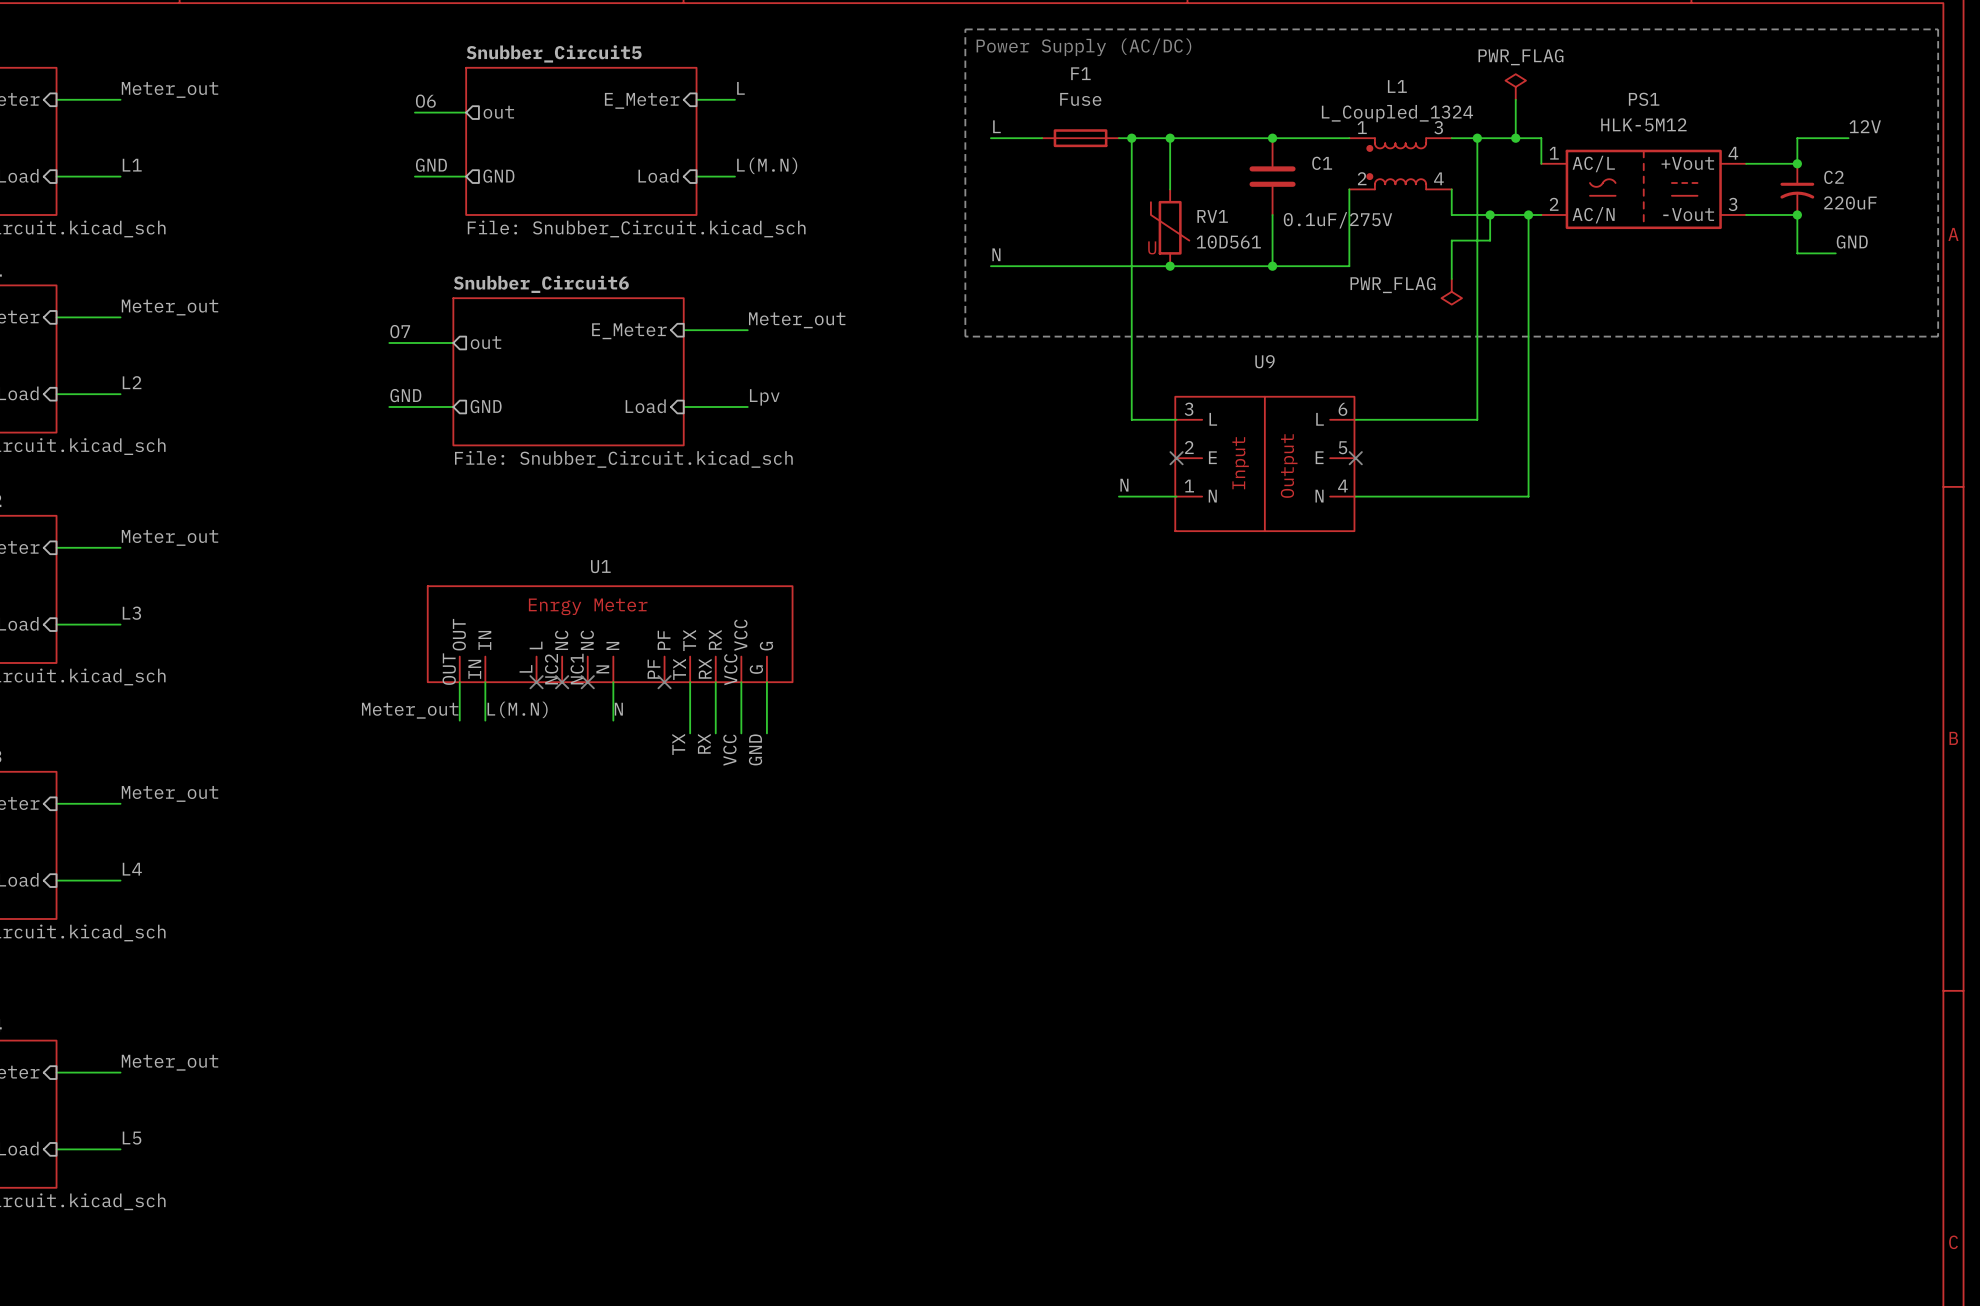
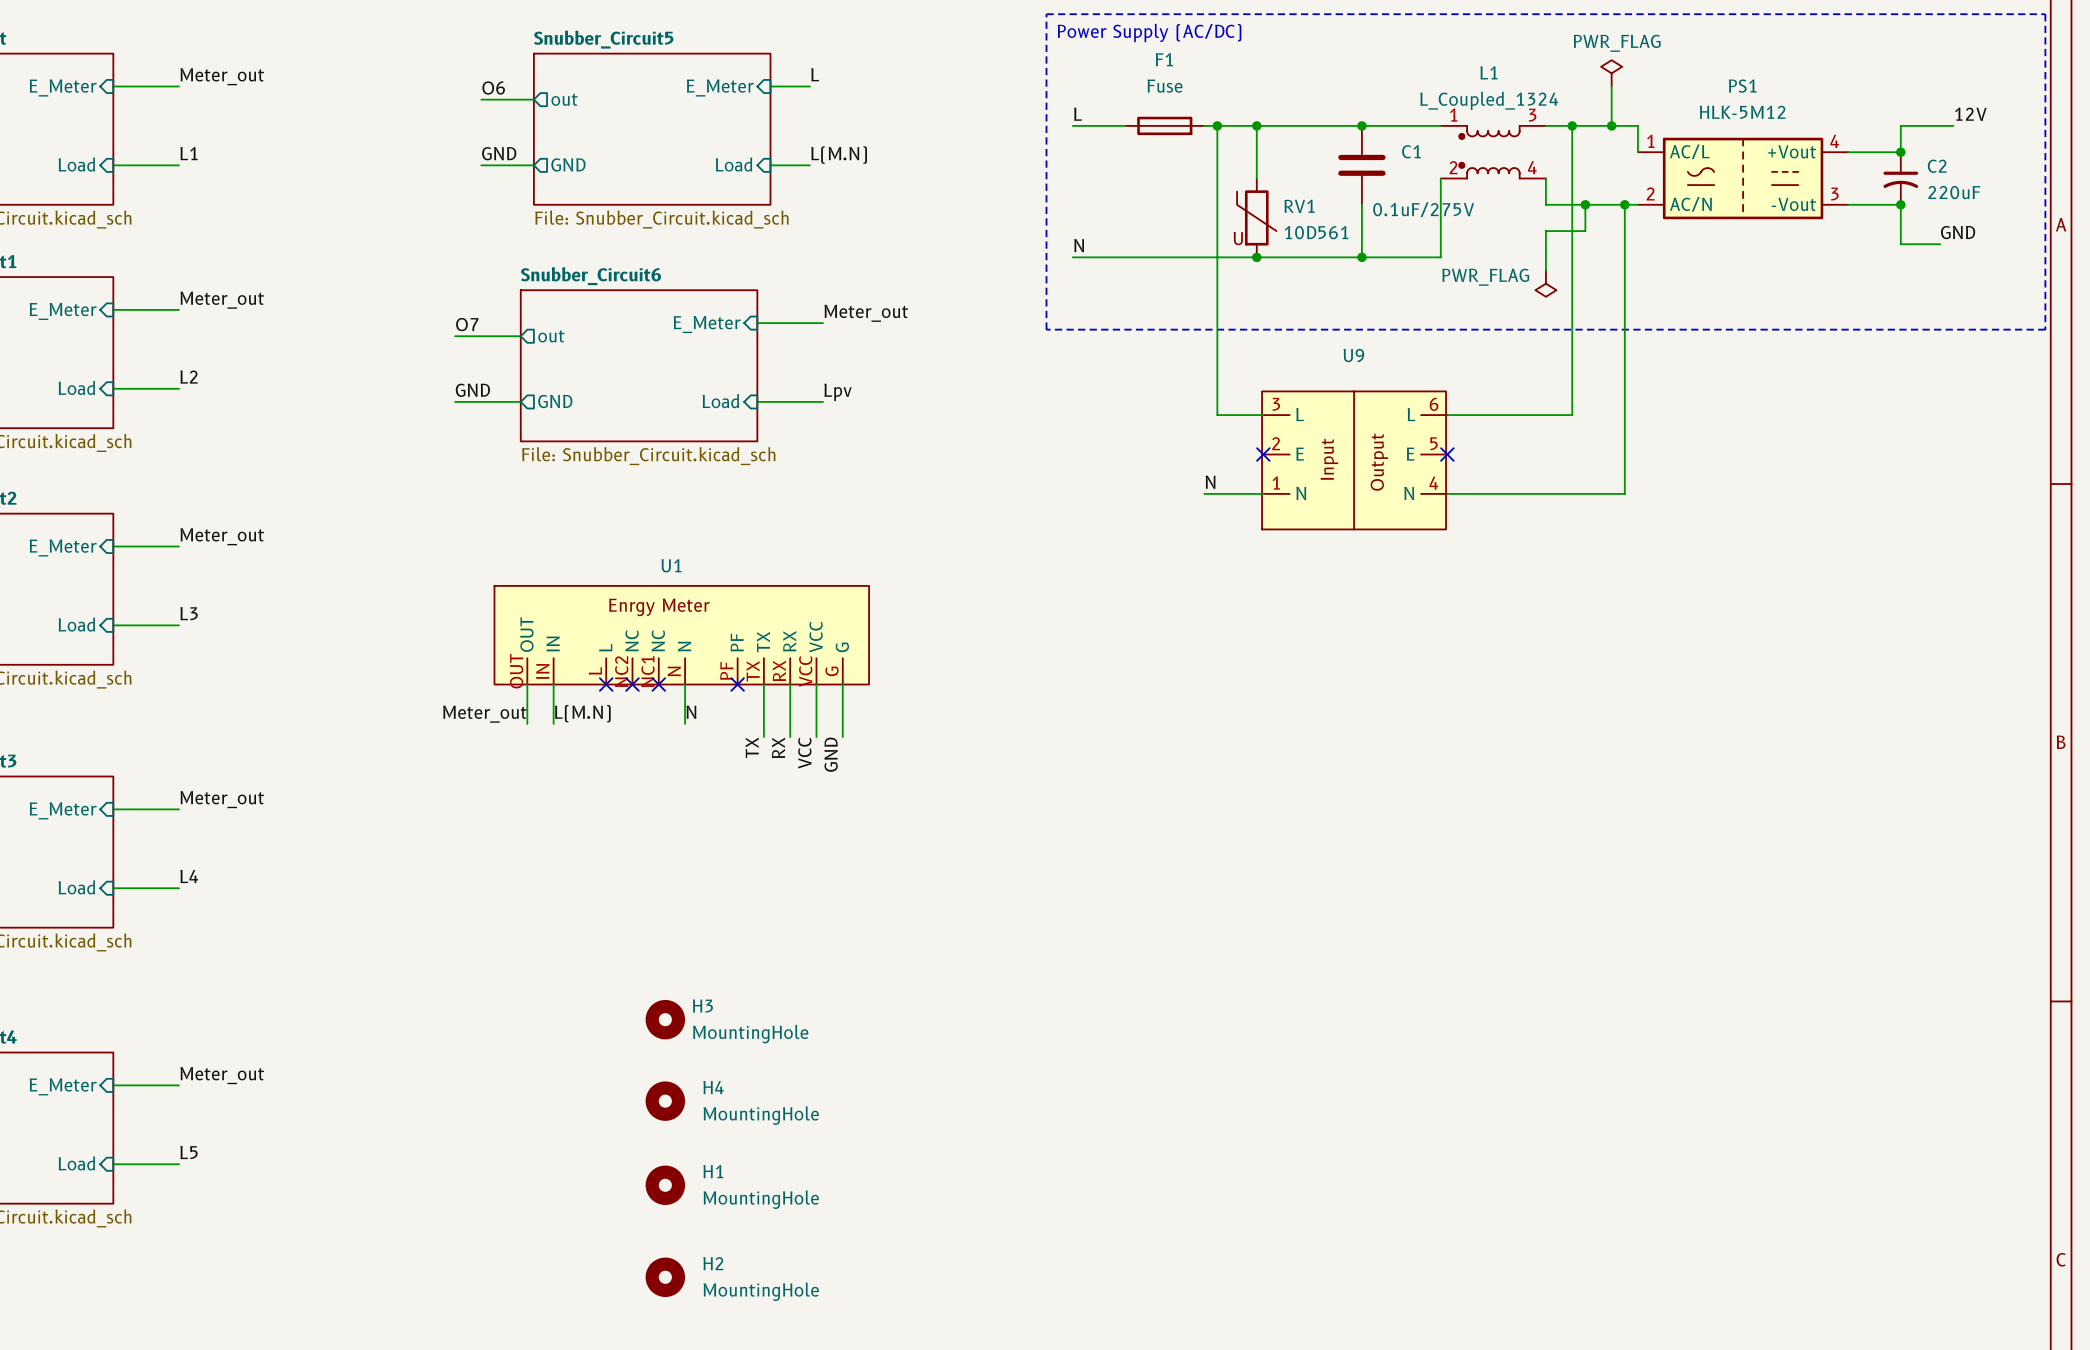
H3: none -> MountingHole (665, 1019)
H4: none -> MountingHole (665, 1101)
H1: none -> MountingHole (665, 1185)
H2: none -> MountingHole (665, 1277)

